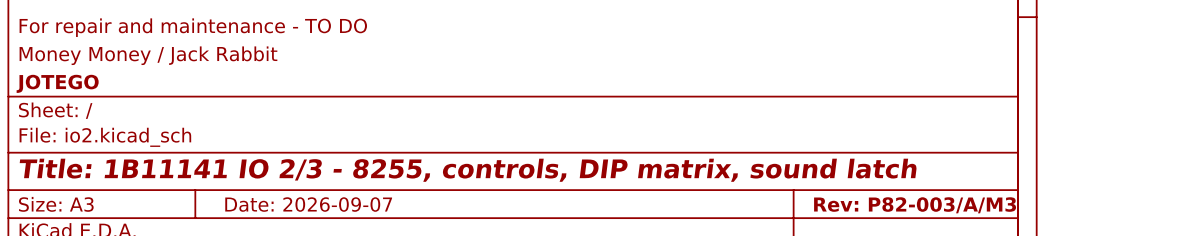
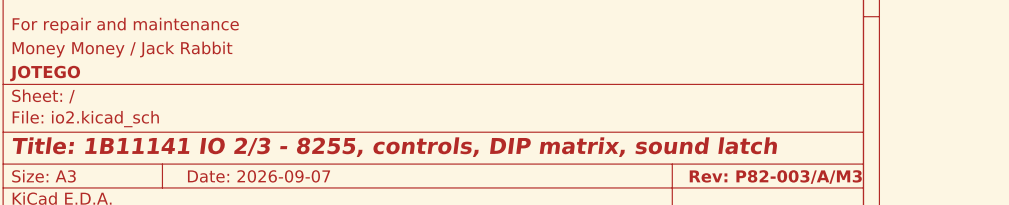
title block: For repair and maintenance - TO DO (193, 27) -> For repair and maintenance (125, 25)

